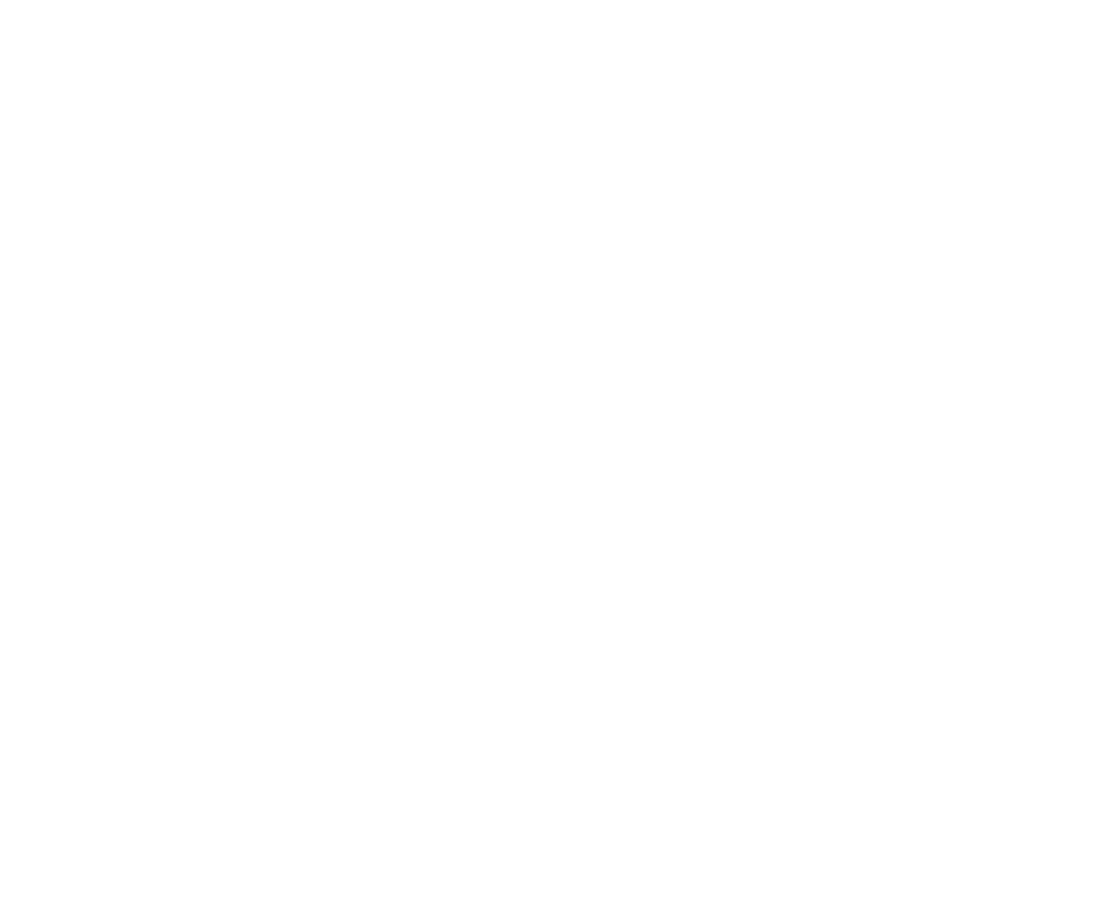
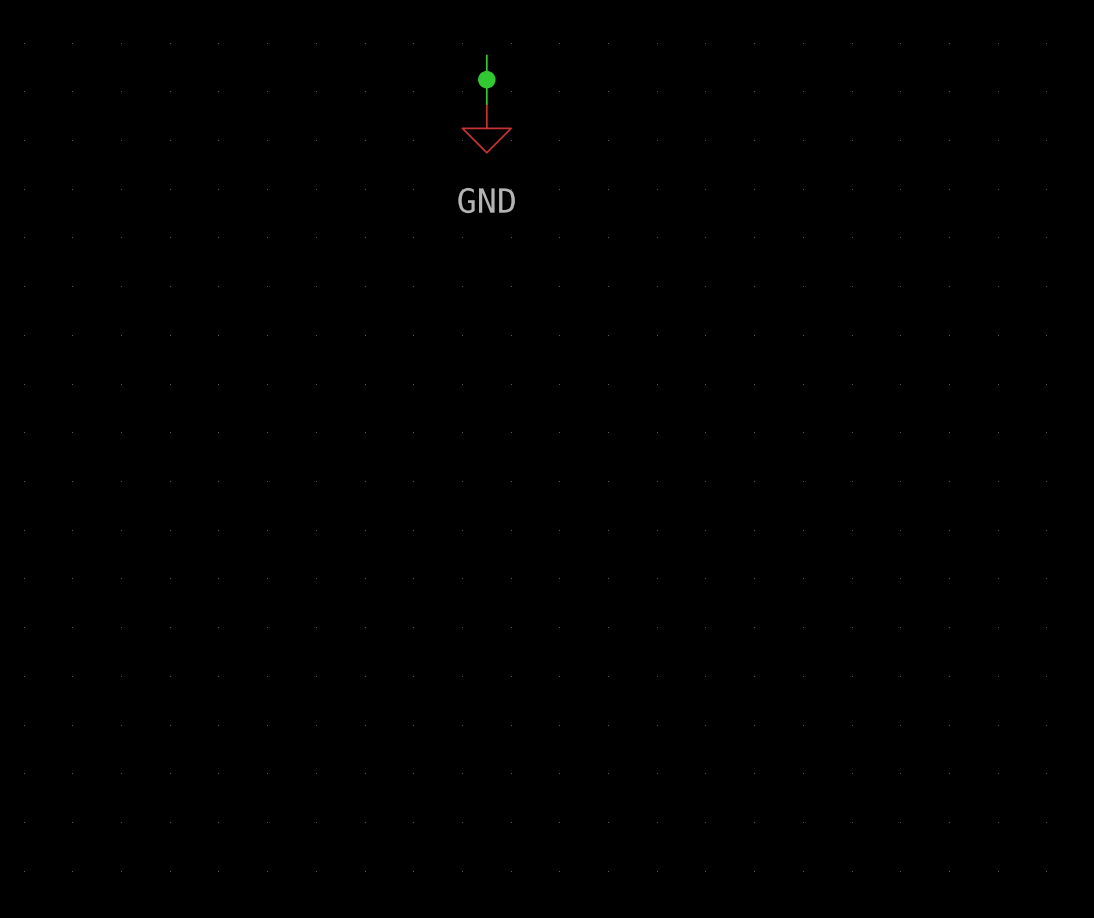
wire: none -> (486, 55) (486, 104)
junction: none -> (486, 79)
power symbol: none -> GND (486, 128)

